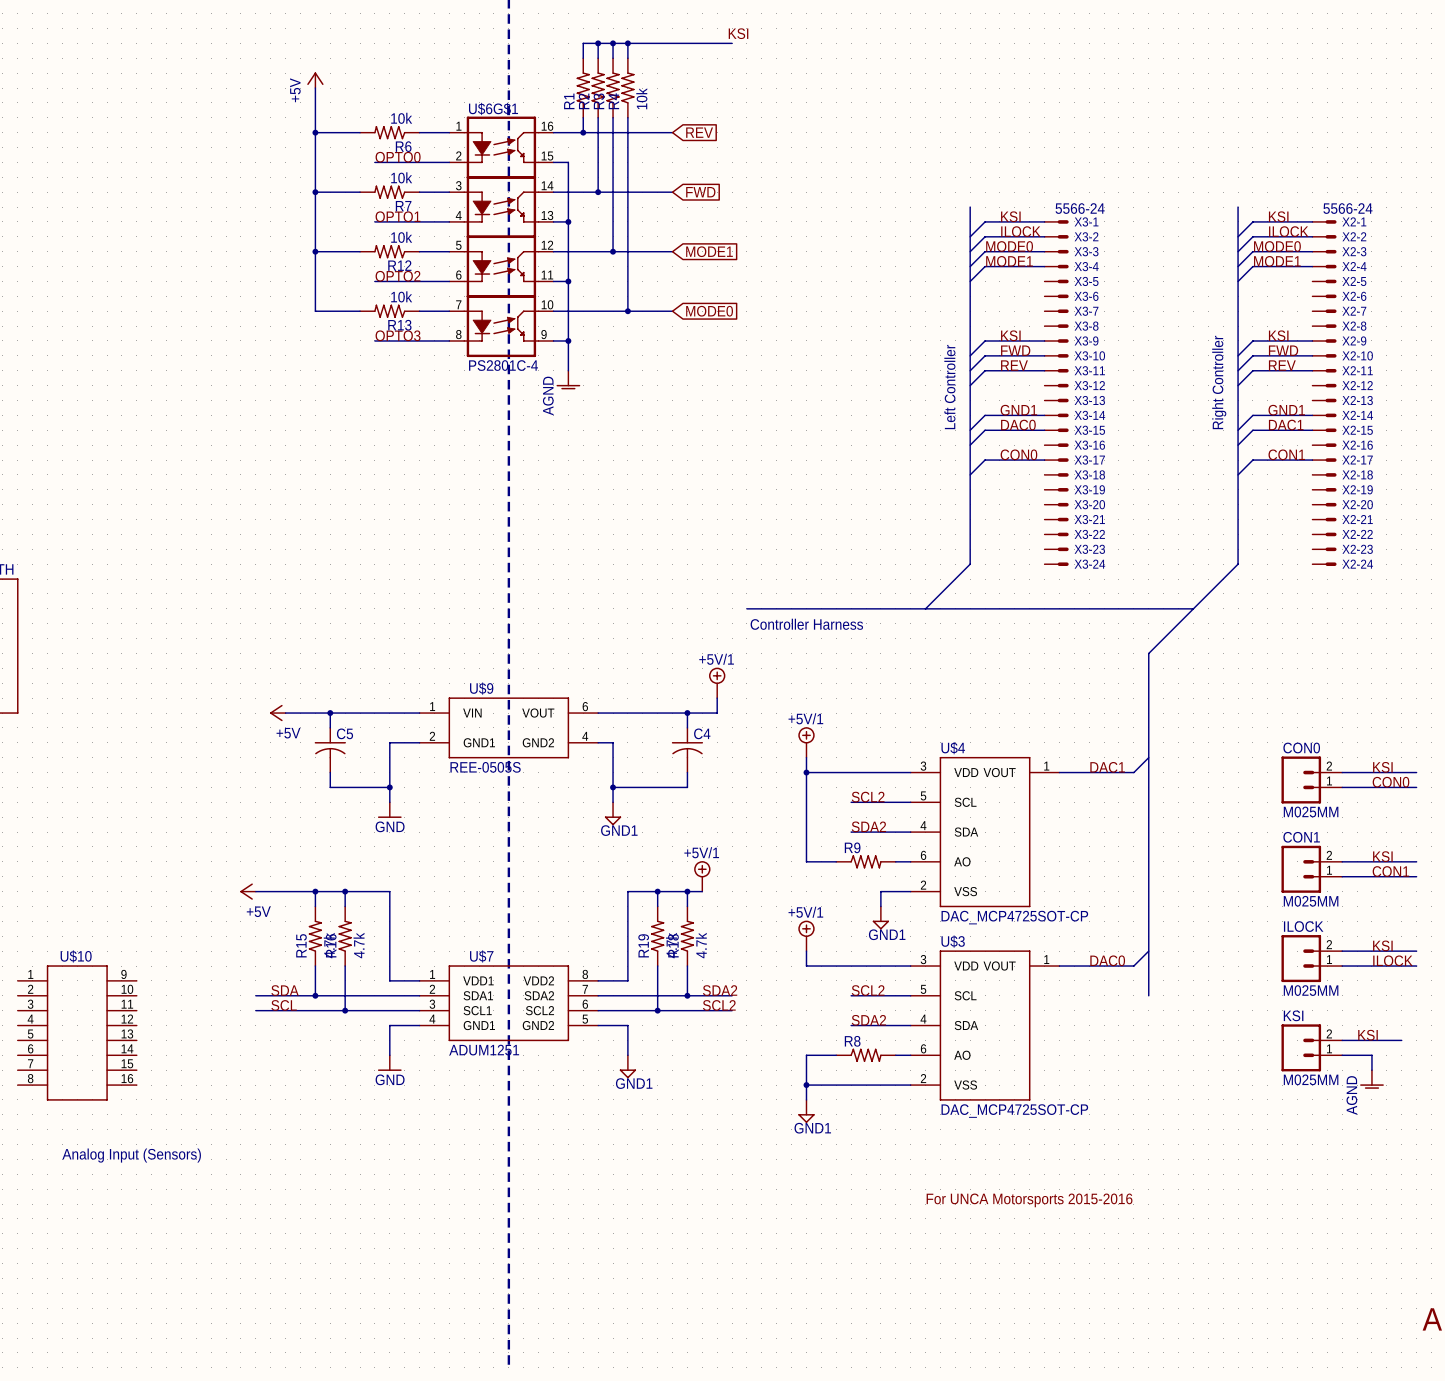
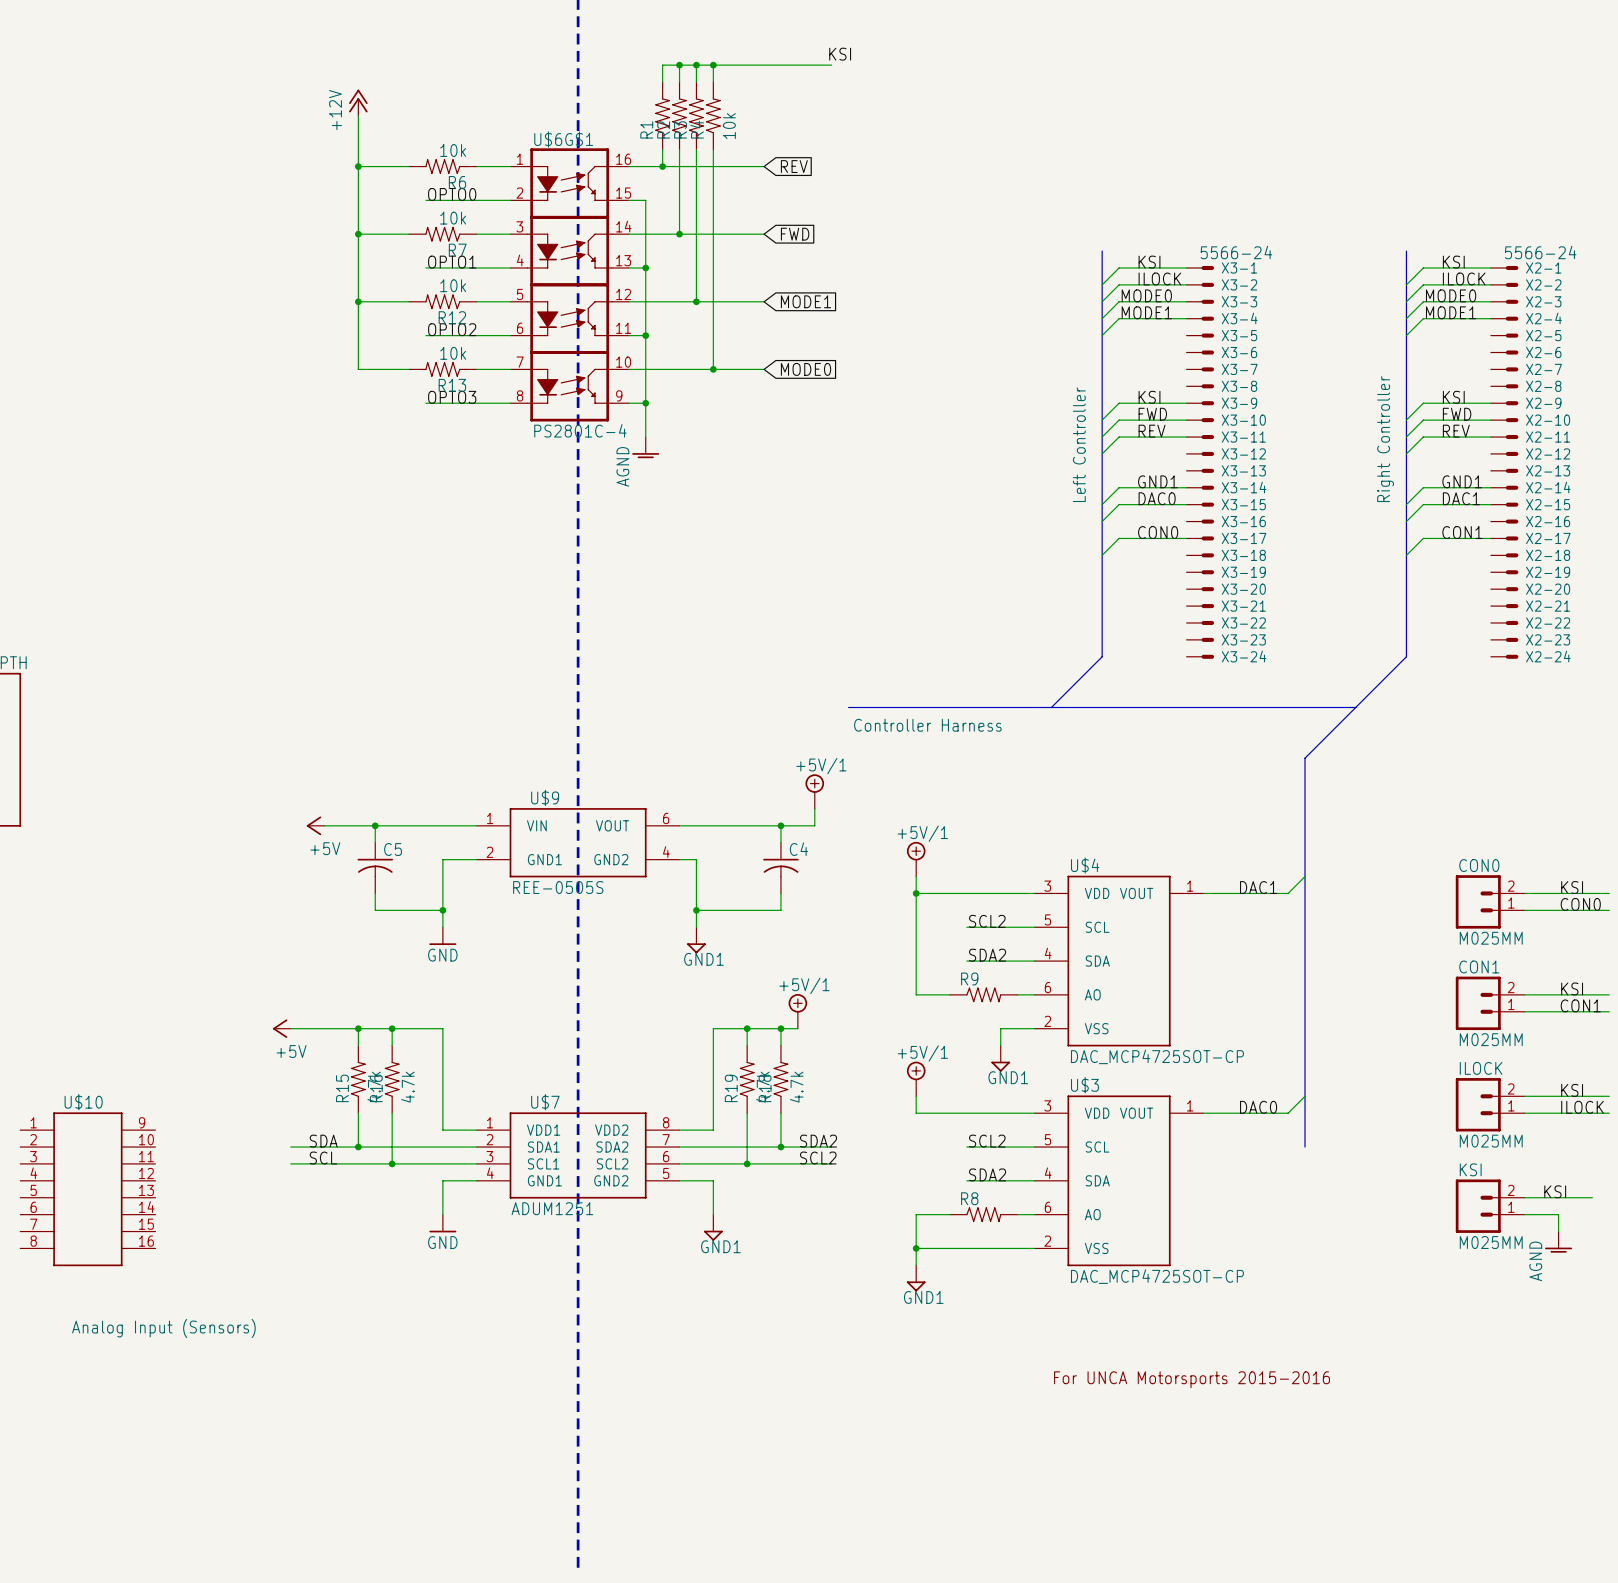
power symbol: +5V (315, 80) -> +12V (358, 102)

